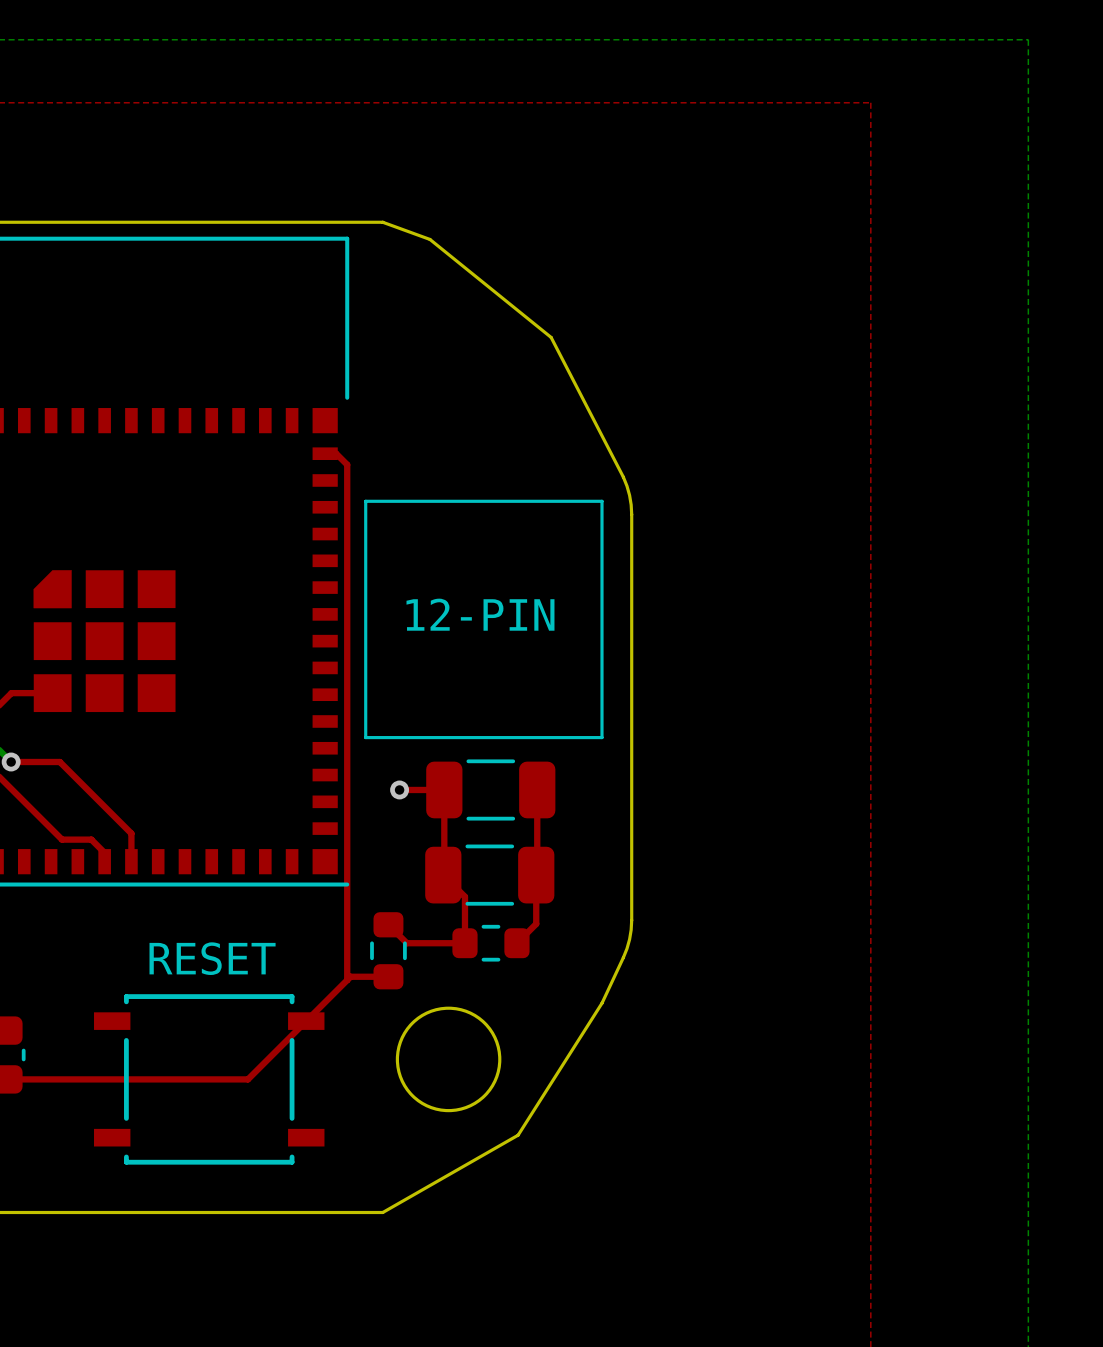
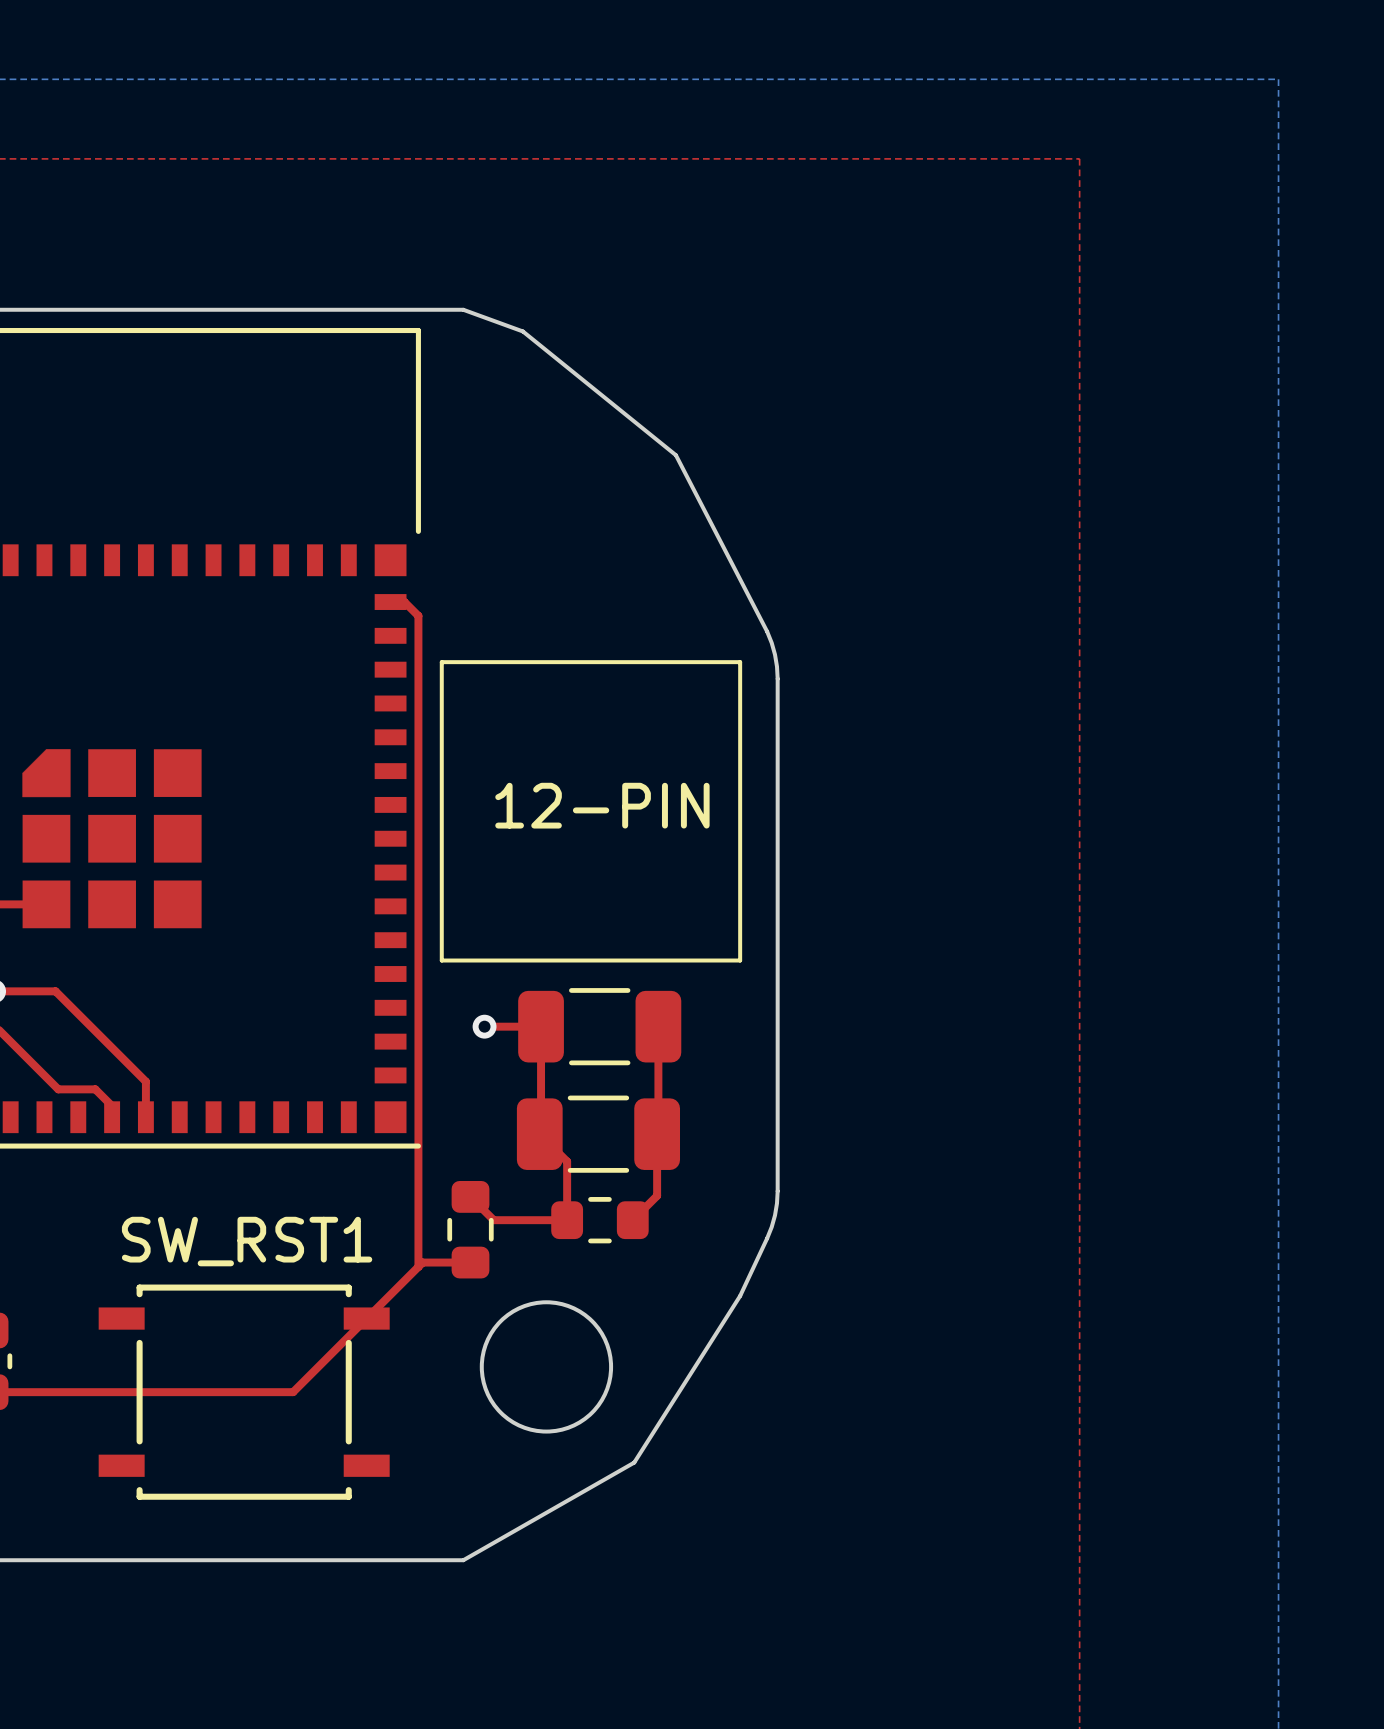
RESET name: RESET (212, 958) -> SW_RST1 (247, 1241)

